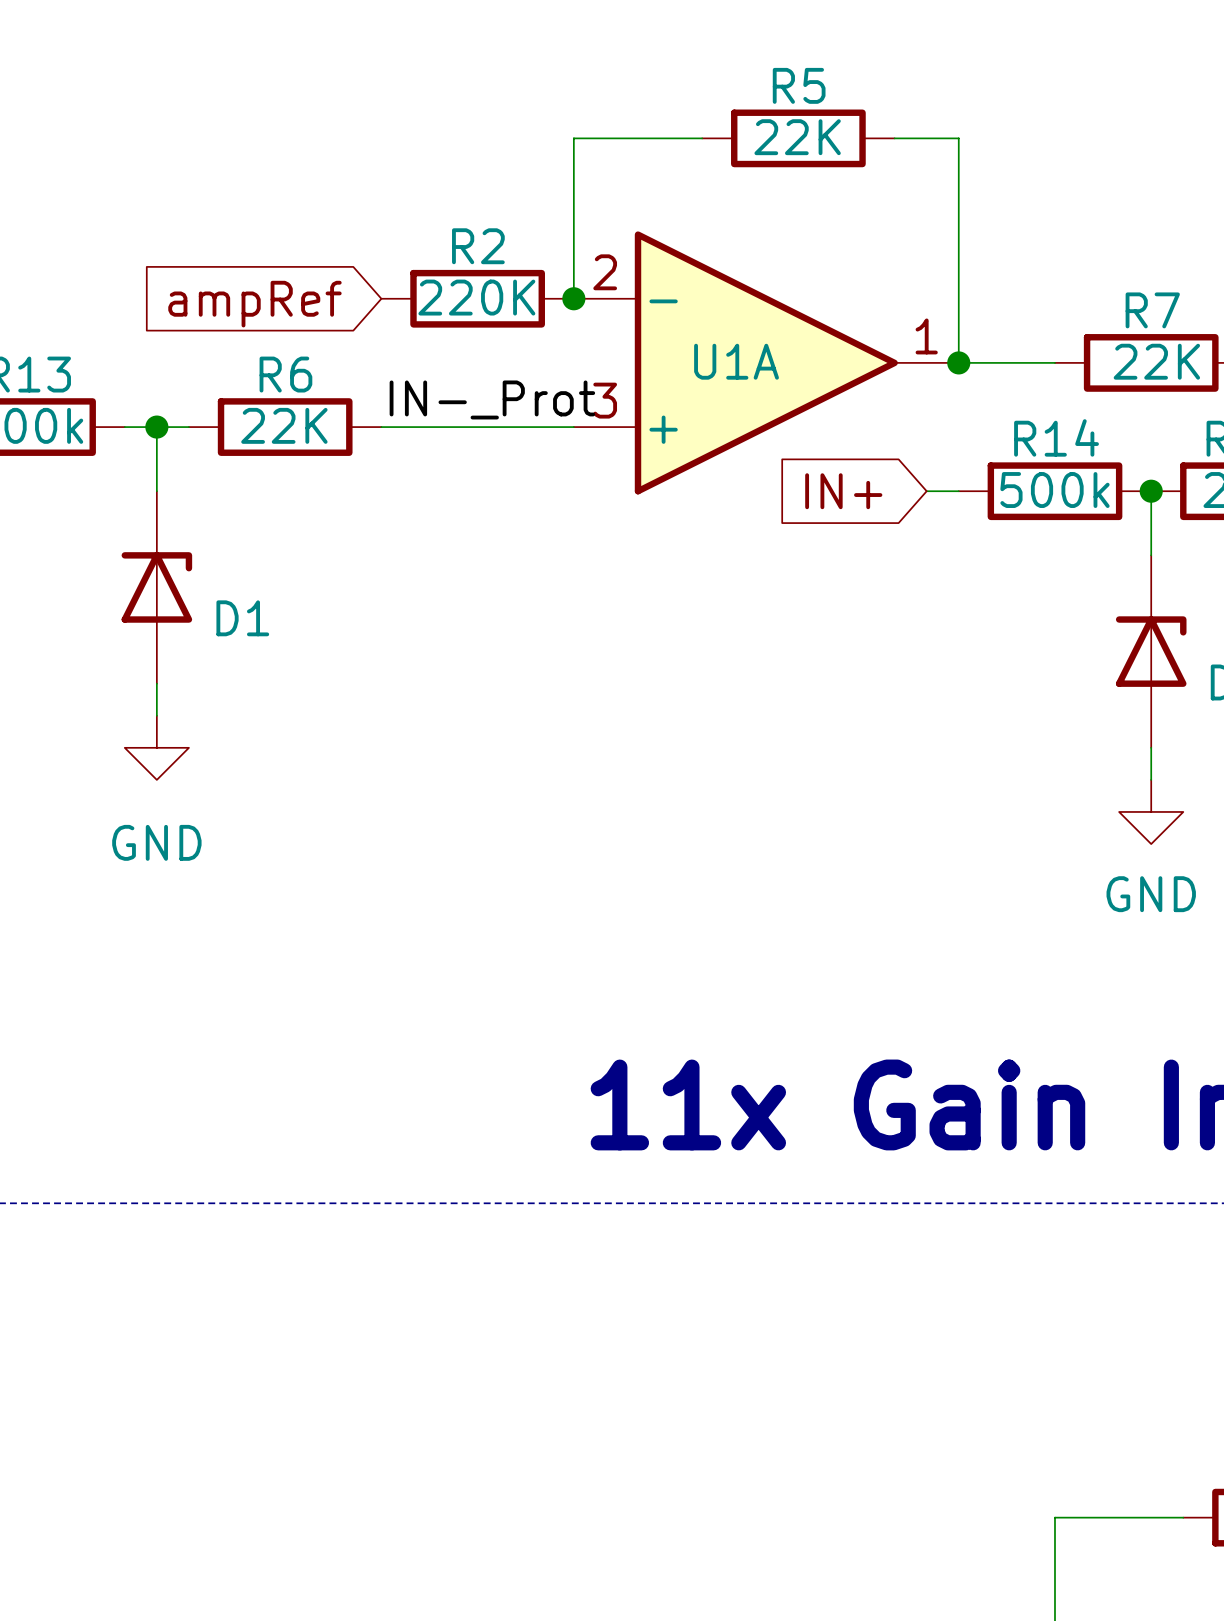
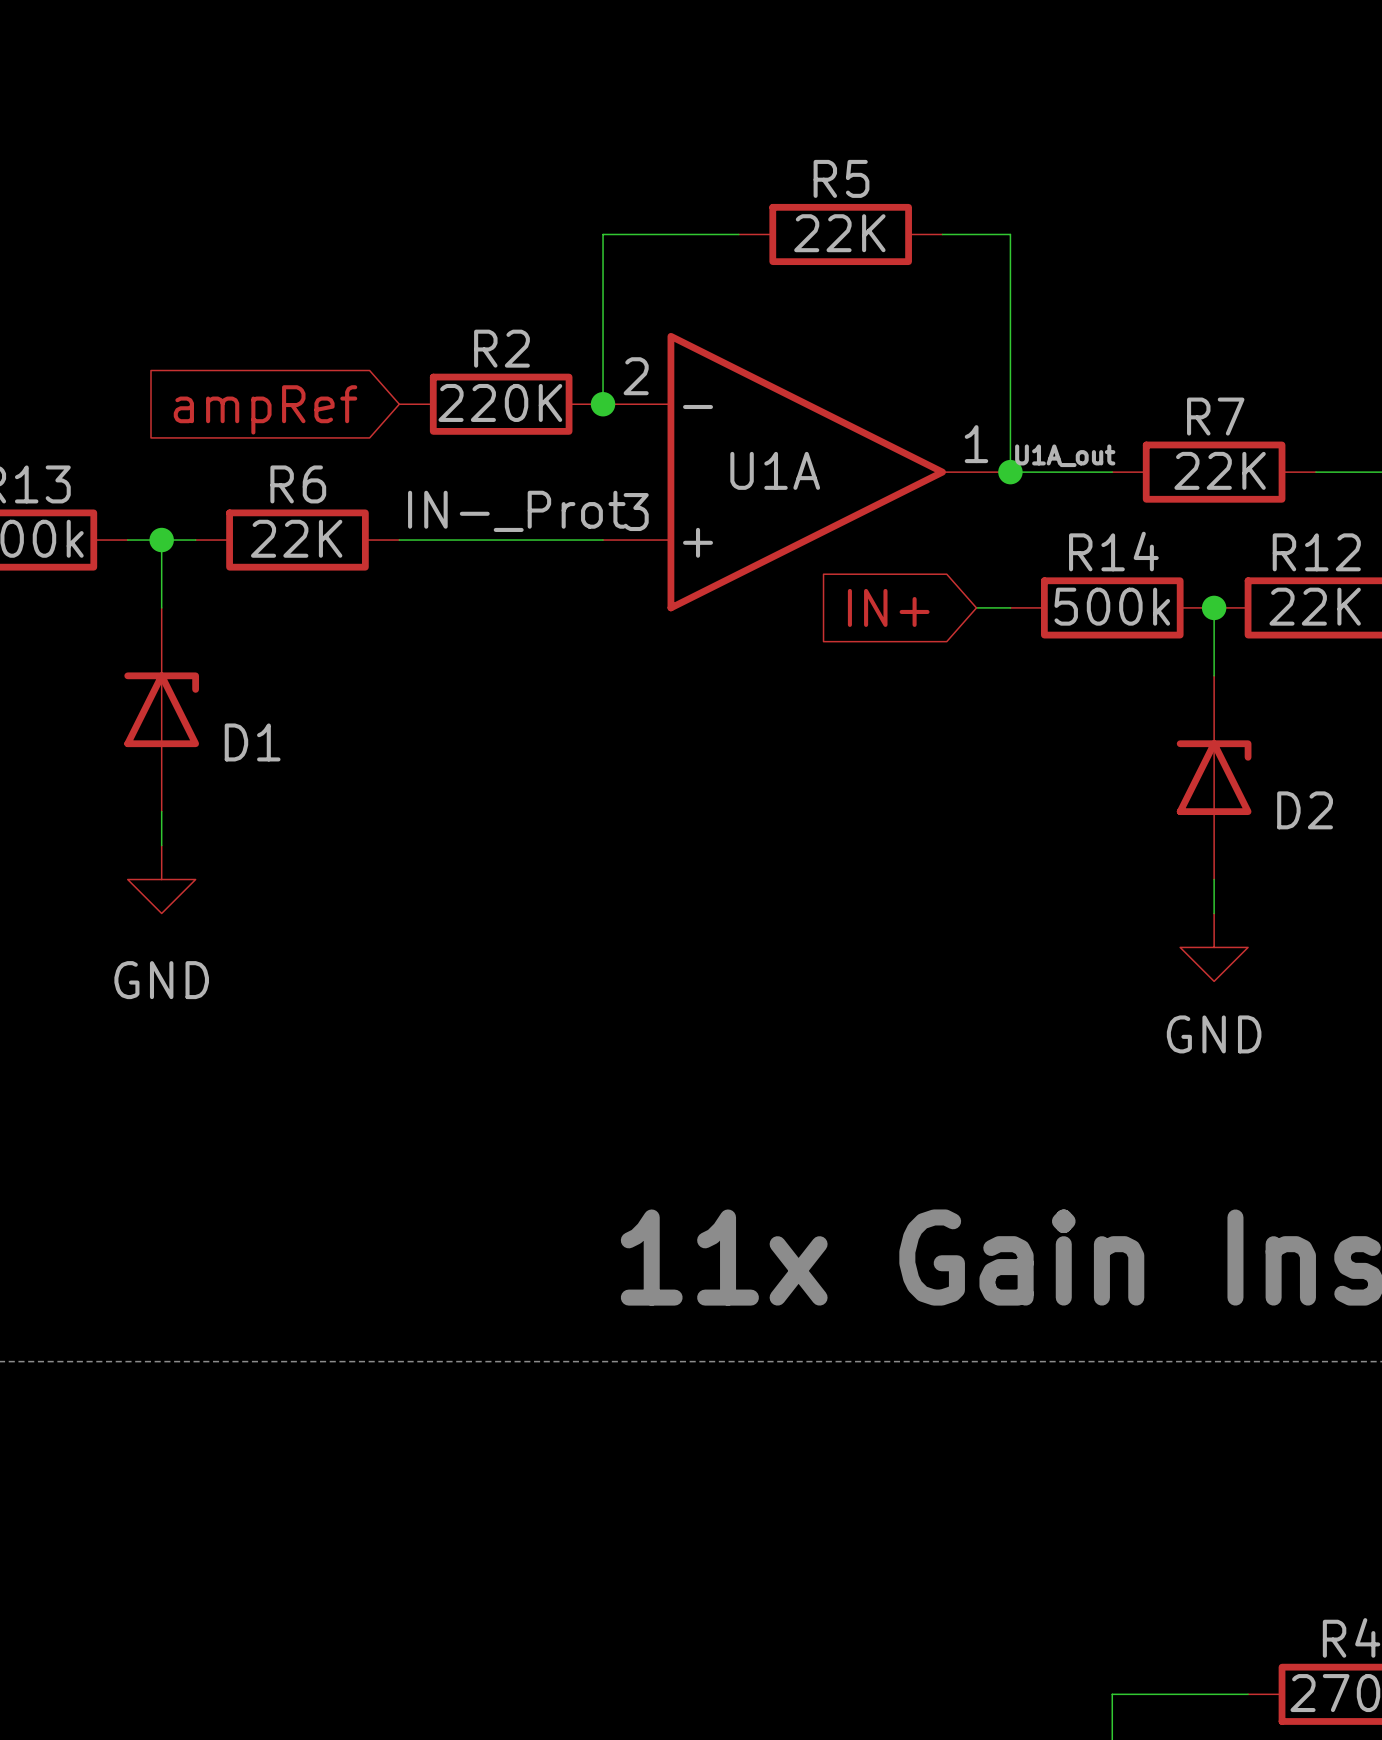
label: none -> U1A_out (1065, 455)

